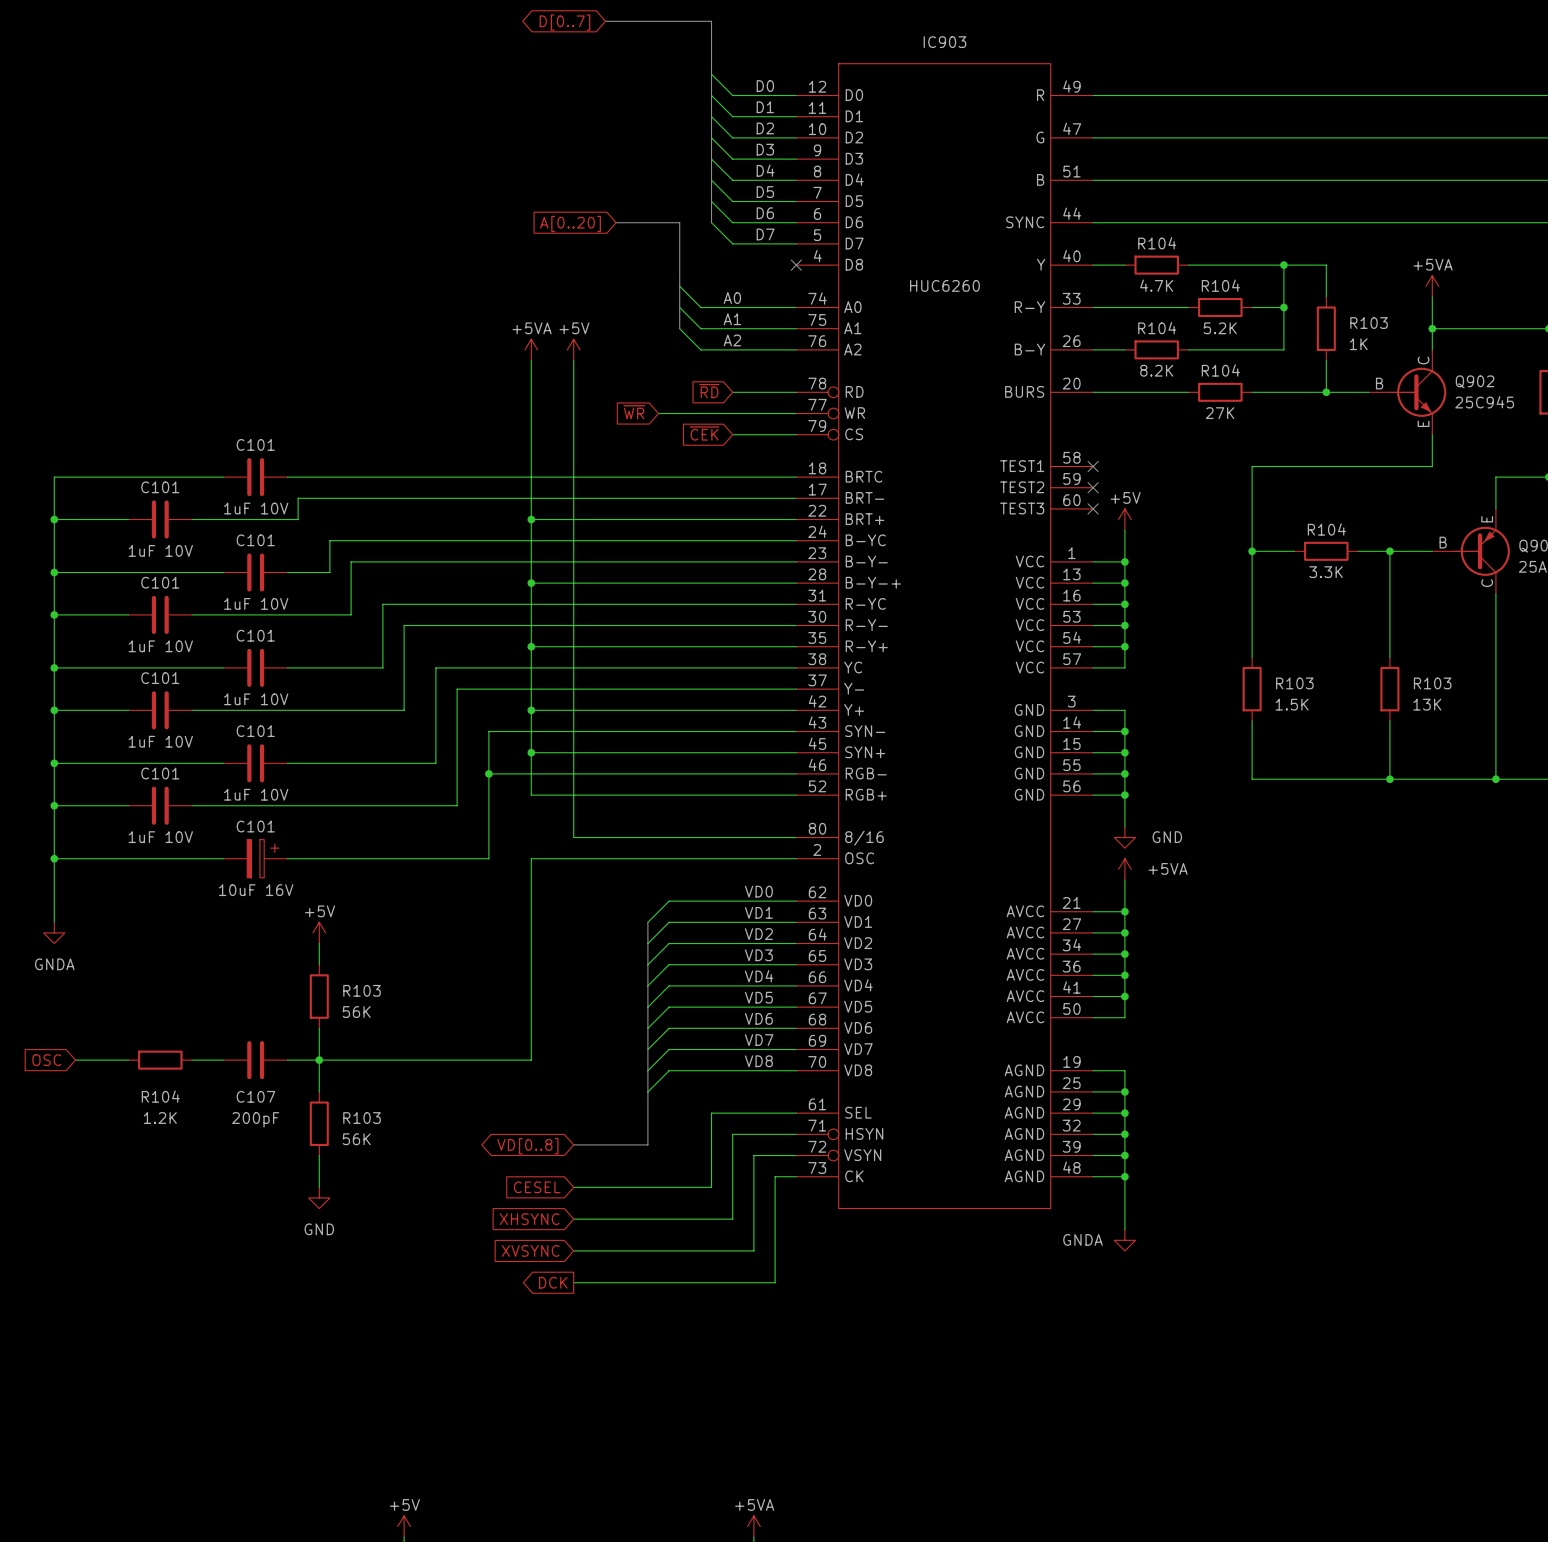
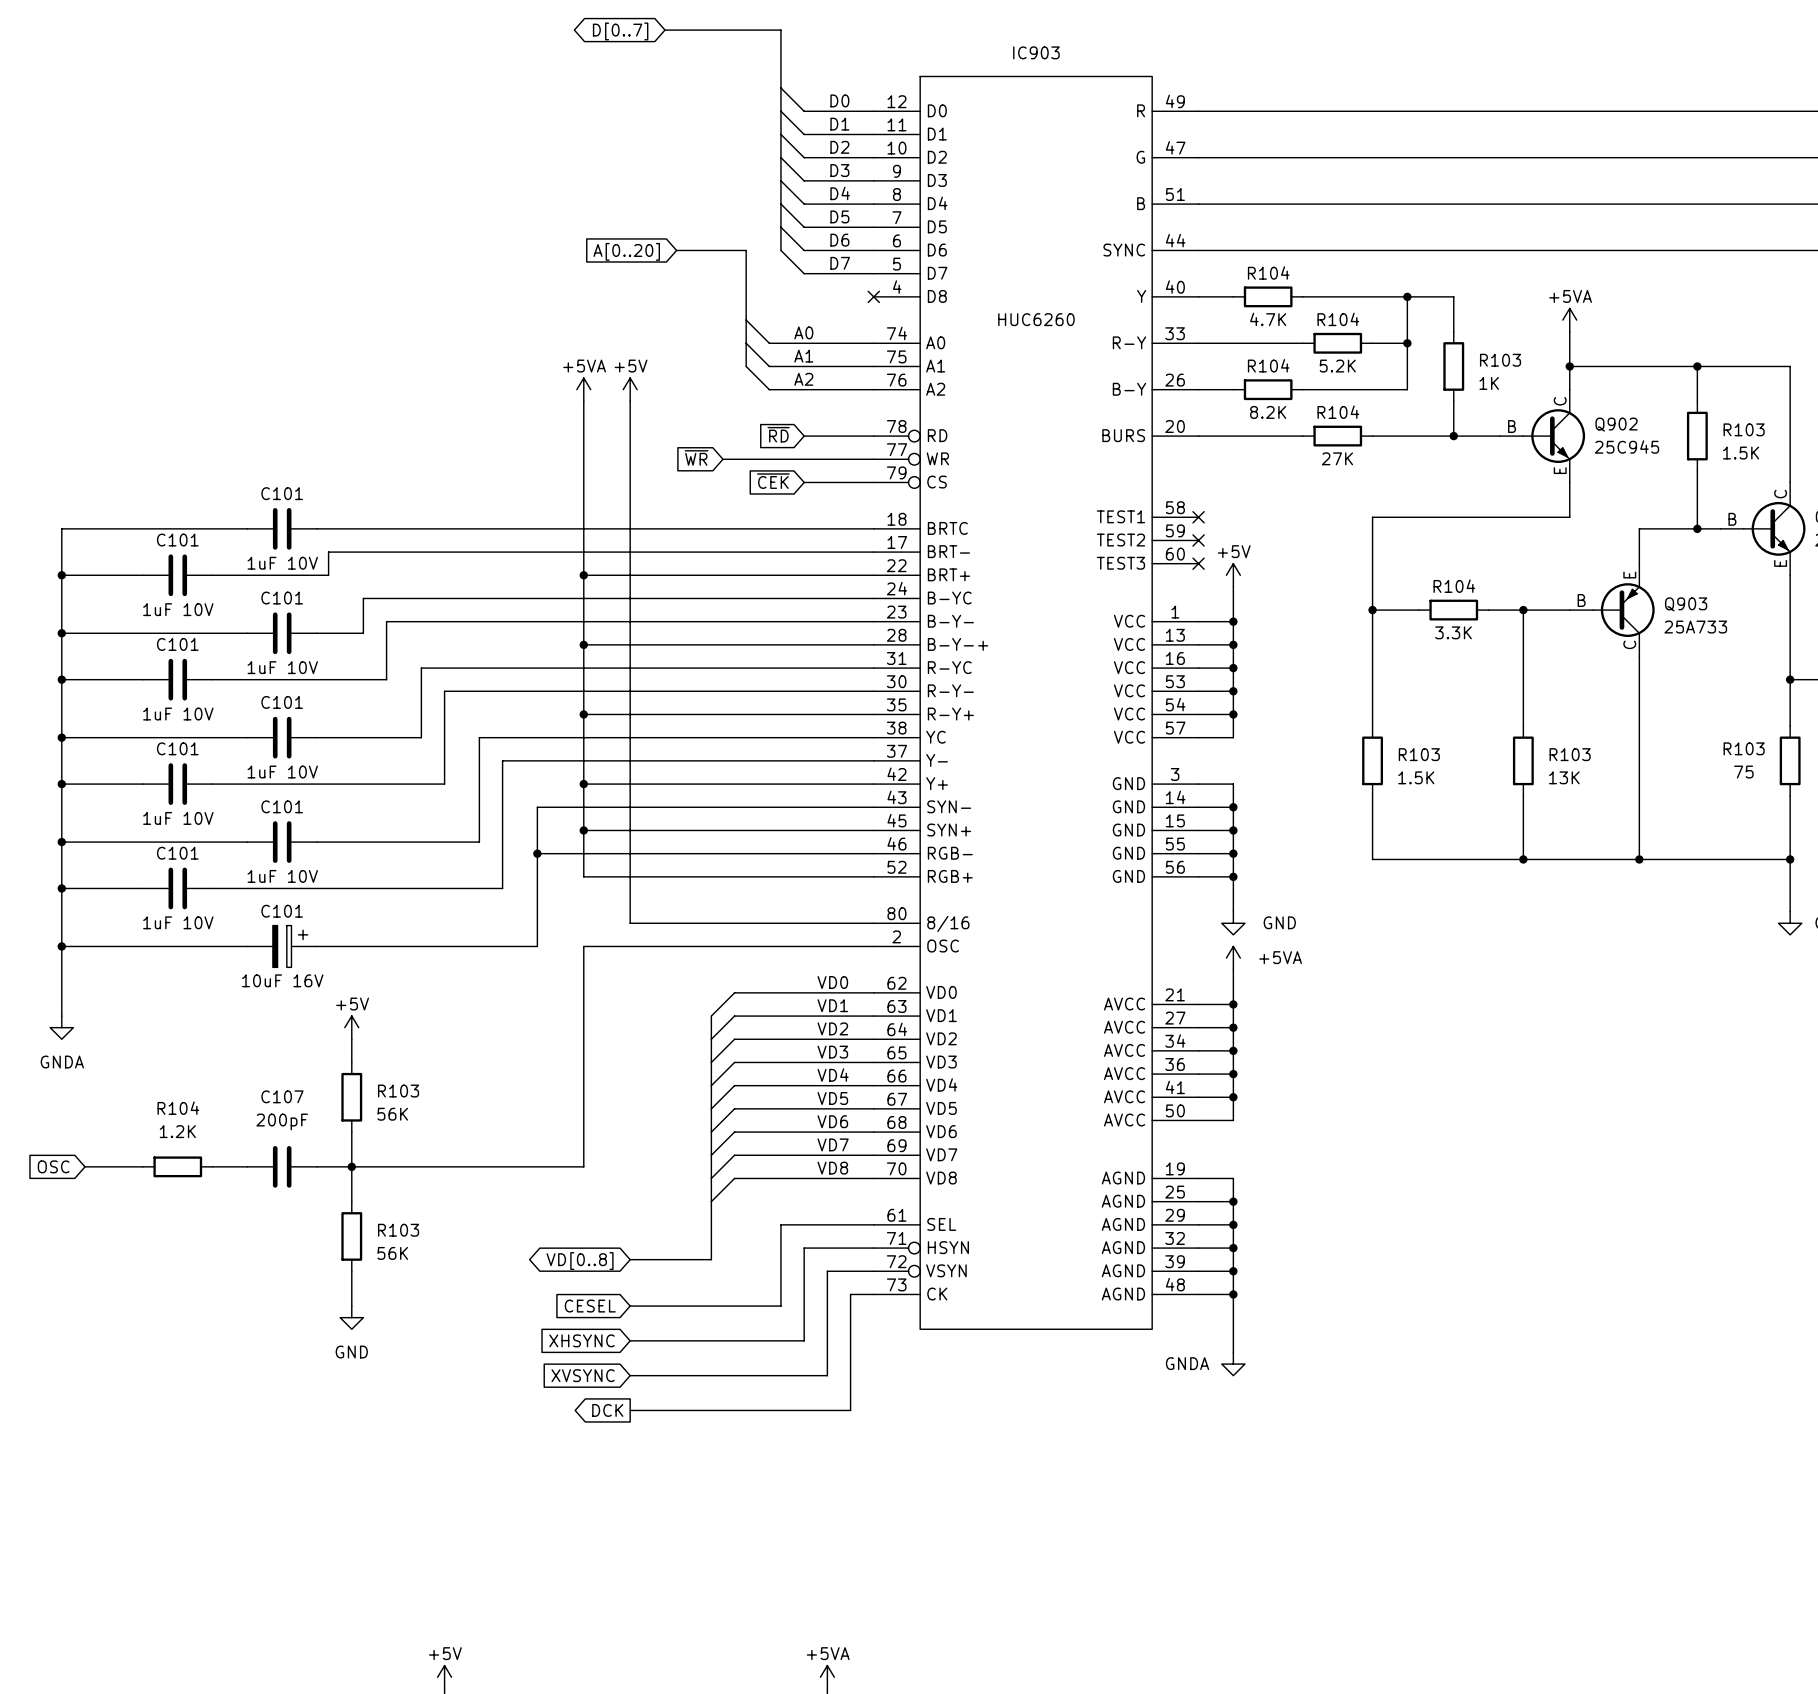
R104 name position: R104 (160, 1096) -> R104 (178, 1108)
C107 name position: C107 (255, 1096) -> C107 (282, 1096)
R104 value position: 1.2K (160, 1118) -> 1.2K (177, 1131)
C107 value position: 200pF (255, 1119) -> 200pF (282, 1121)

